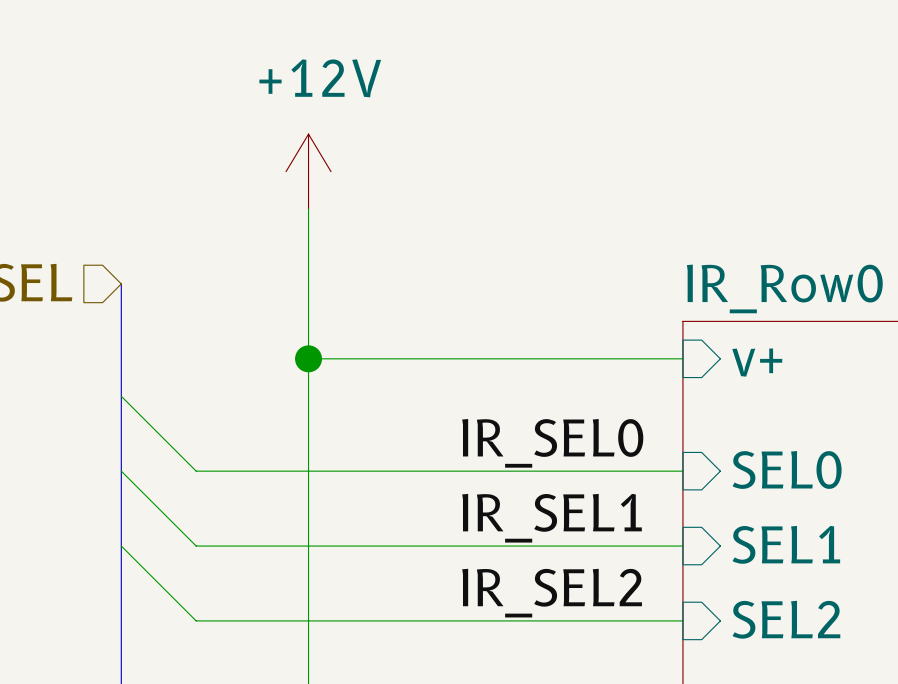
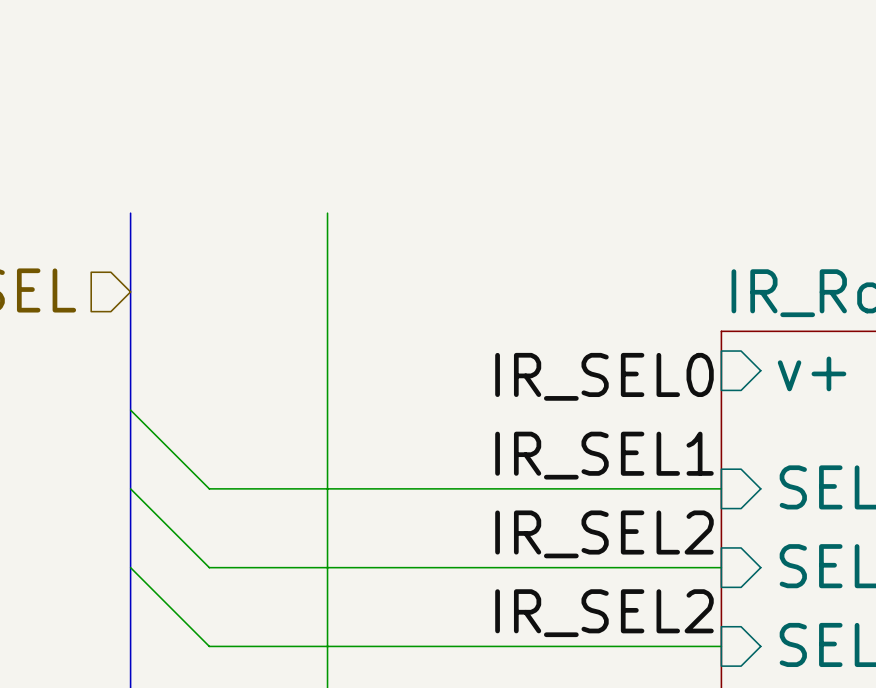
power symbol: +12V (308, 171) -> none
bus: none -> (130, 213) (130, 291)
wire: (308, 358) (682, 358) -> none
junction: (308, 358) -> none
label: none -> IR_SEL0 (604, 376)
label: IR_SEL0 (552, 443) -> IR_SEL1 (604, 455)
label: IR_SEL1 (552, 518) -> IR_SEL2 (604, 534)

